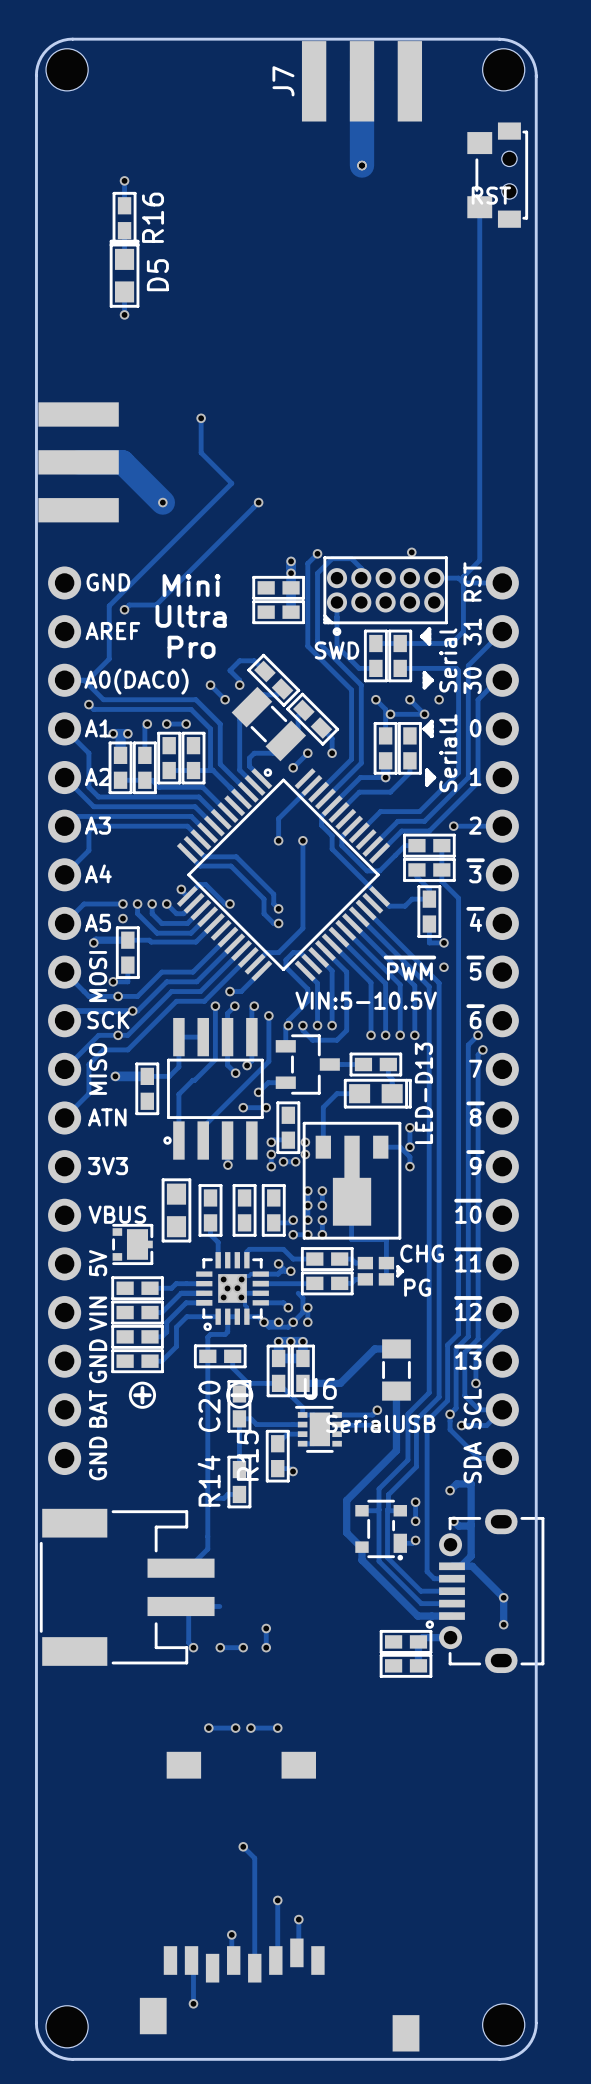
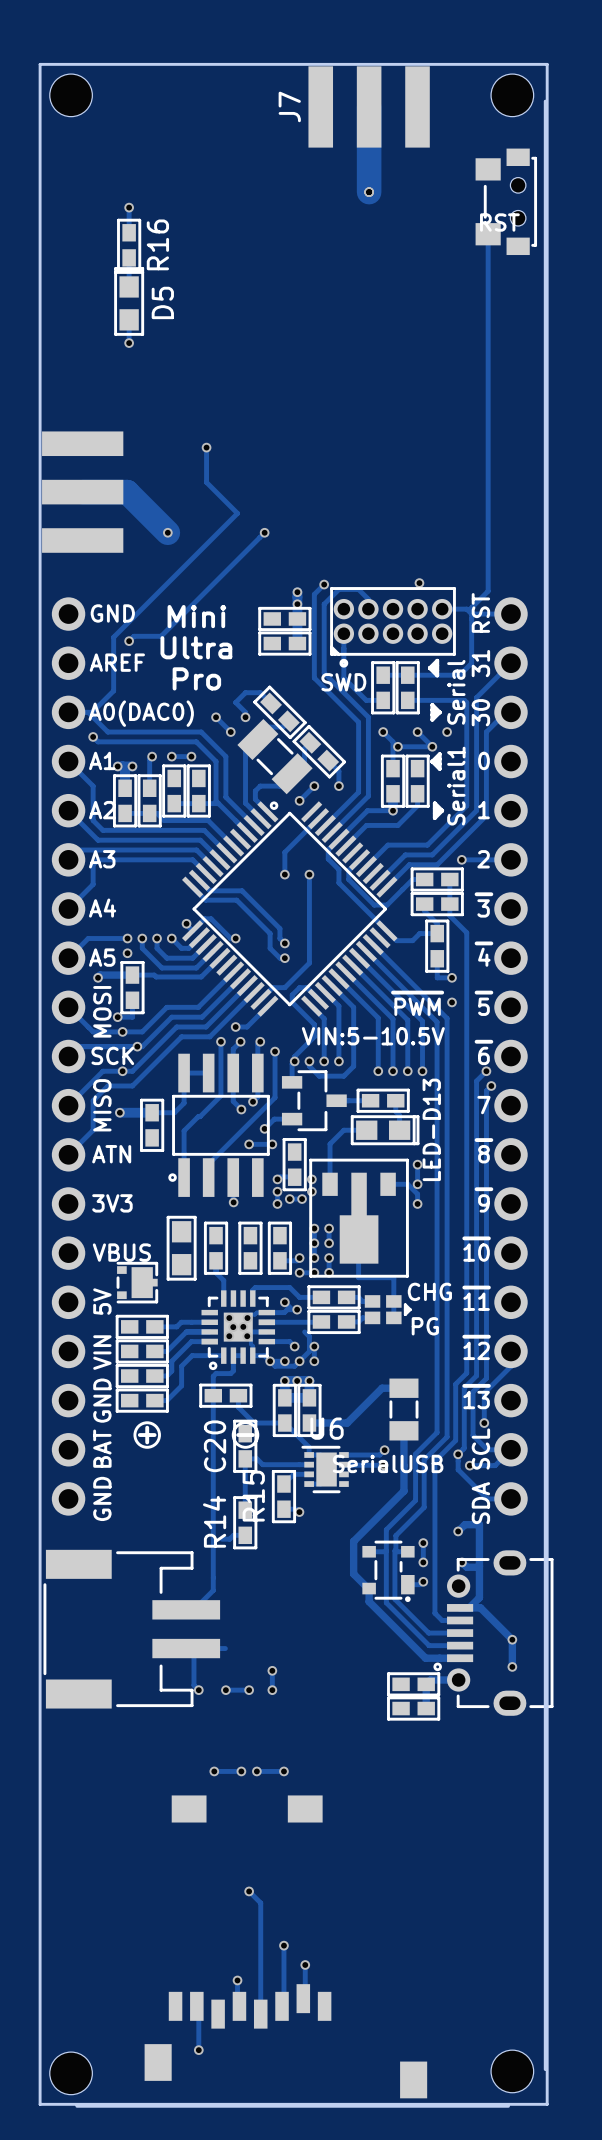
board edge: (72, 39) (58, 41) (47, 49) (39, 61) (36, 75) -> (76, 64) (40, 64) (40, 101)
board edge: (499, 39) (511, 41) (525, 50) (532, 60) (536, 76) -> (508, 64) (547, 64) (547, 2104) (40, 2104) (40, 2069)
board edge: (36, 2022) (39, 2036) (47, 2048) (58, 2056) (72, 2059) -> none
board edge: (536, 2022) (533, 2036) (525, 2048) (513, 2056) (499, 2059) -> none

